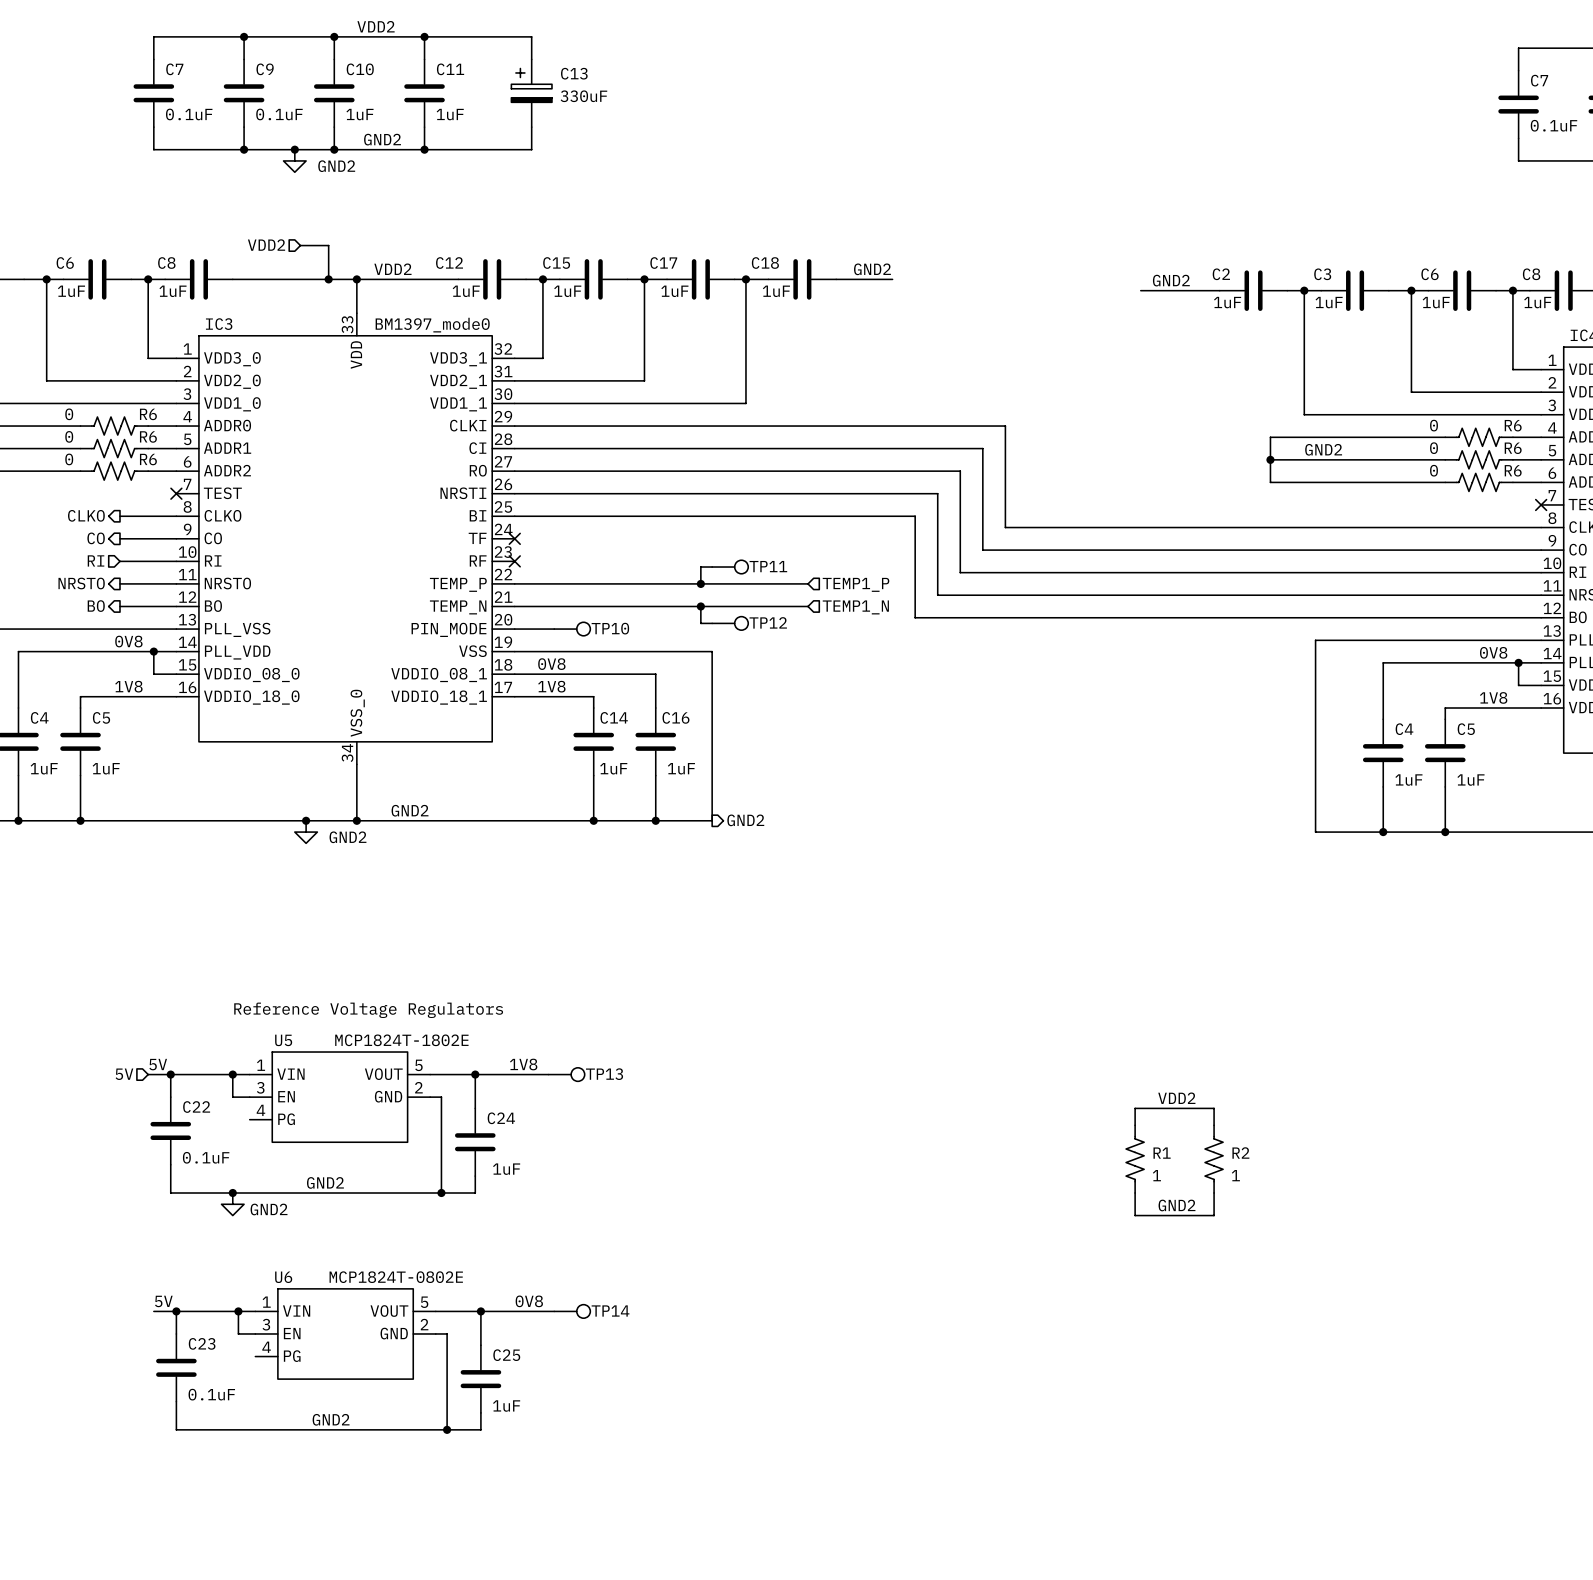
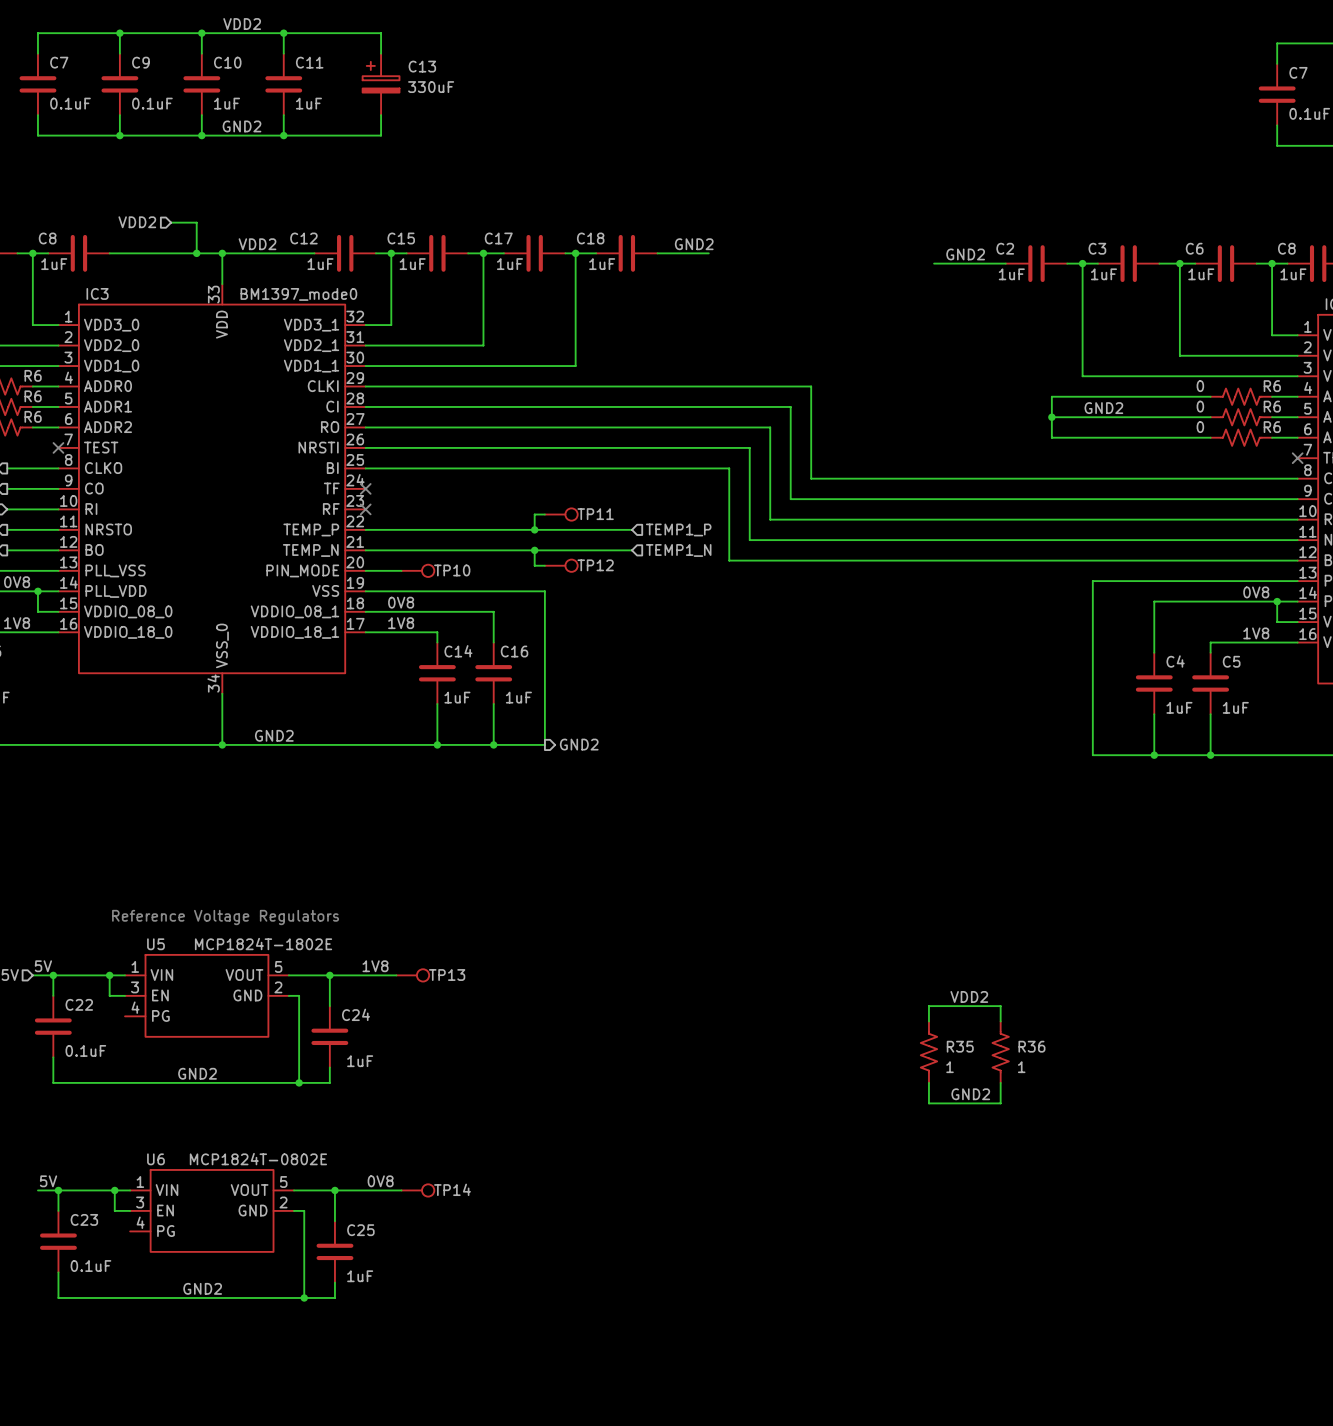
junction: (294, 149) -> none
power symbol: GND2 (294, 160) -> none
junction: (306, 820) -> none
power symbol: GND2 (306, 832) -> none
R1 name: R1 (1162, 1153) -> R35 (960, 1046)
R2 name: R2 (1240, 1153) -> R36 (1031, 1046)
junction: (232, 1193) -> none
power symbol: GND2 (232, 1204) -> none

